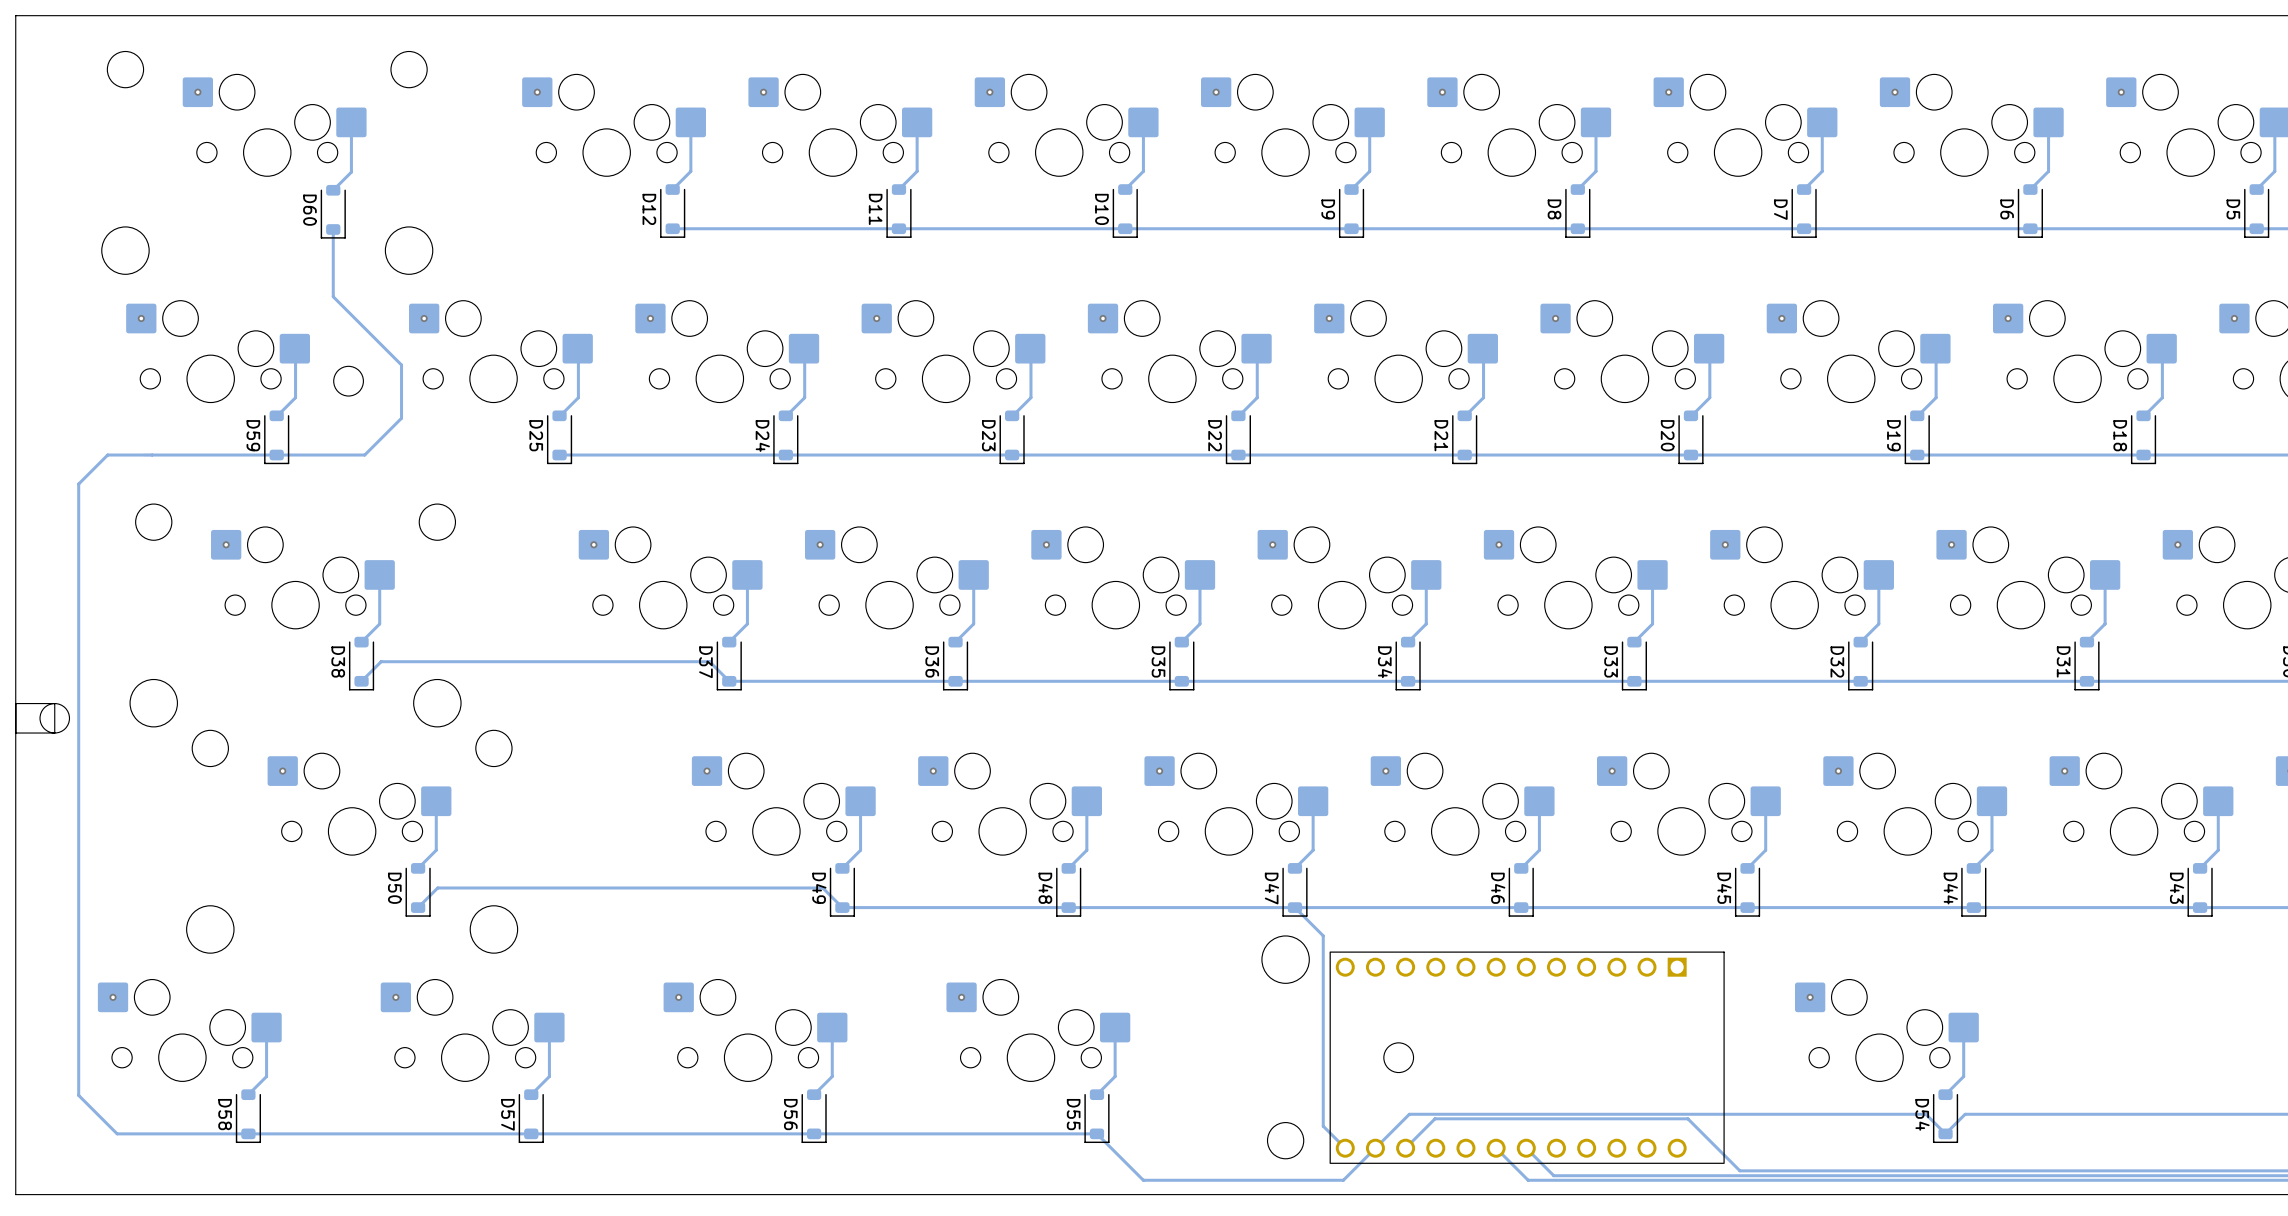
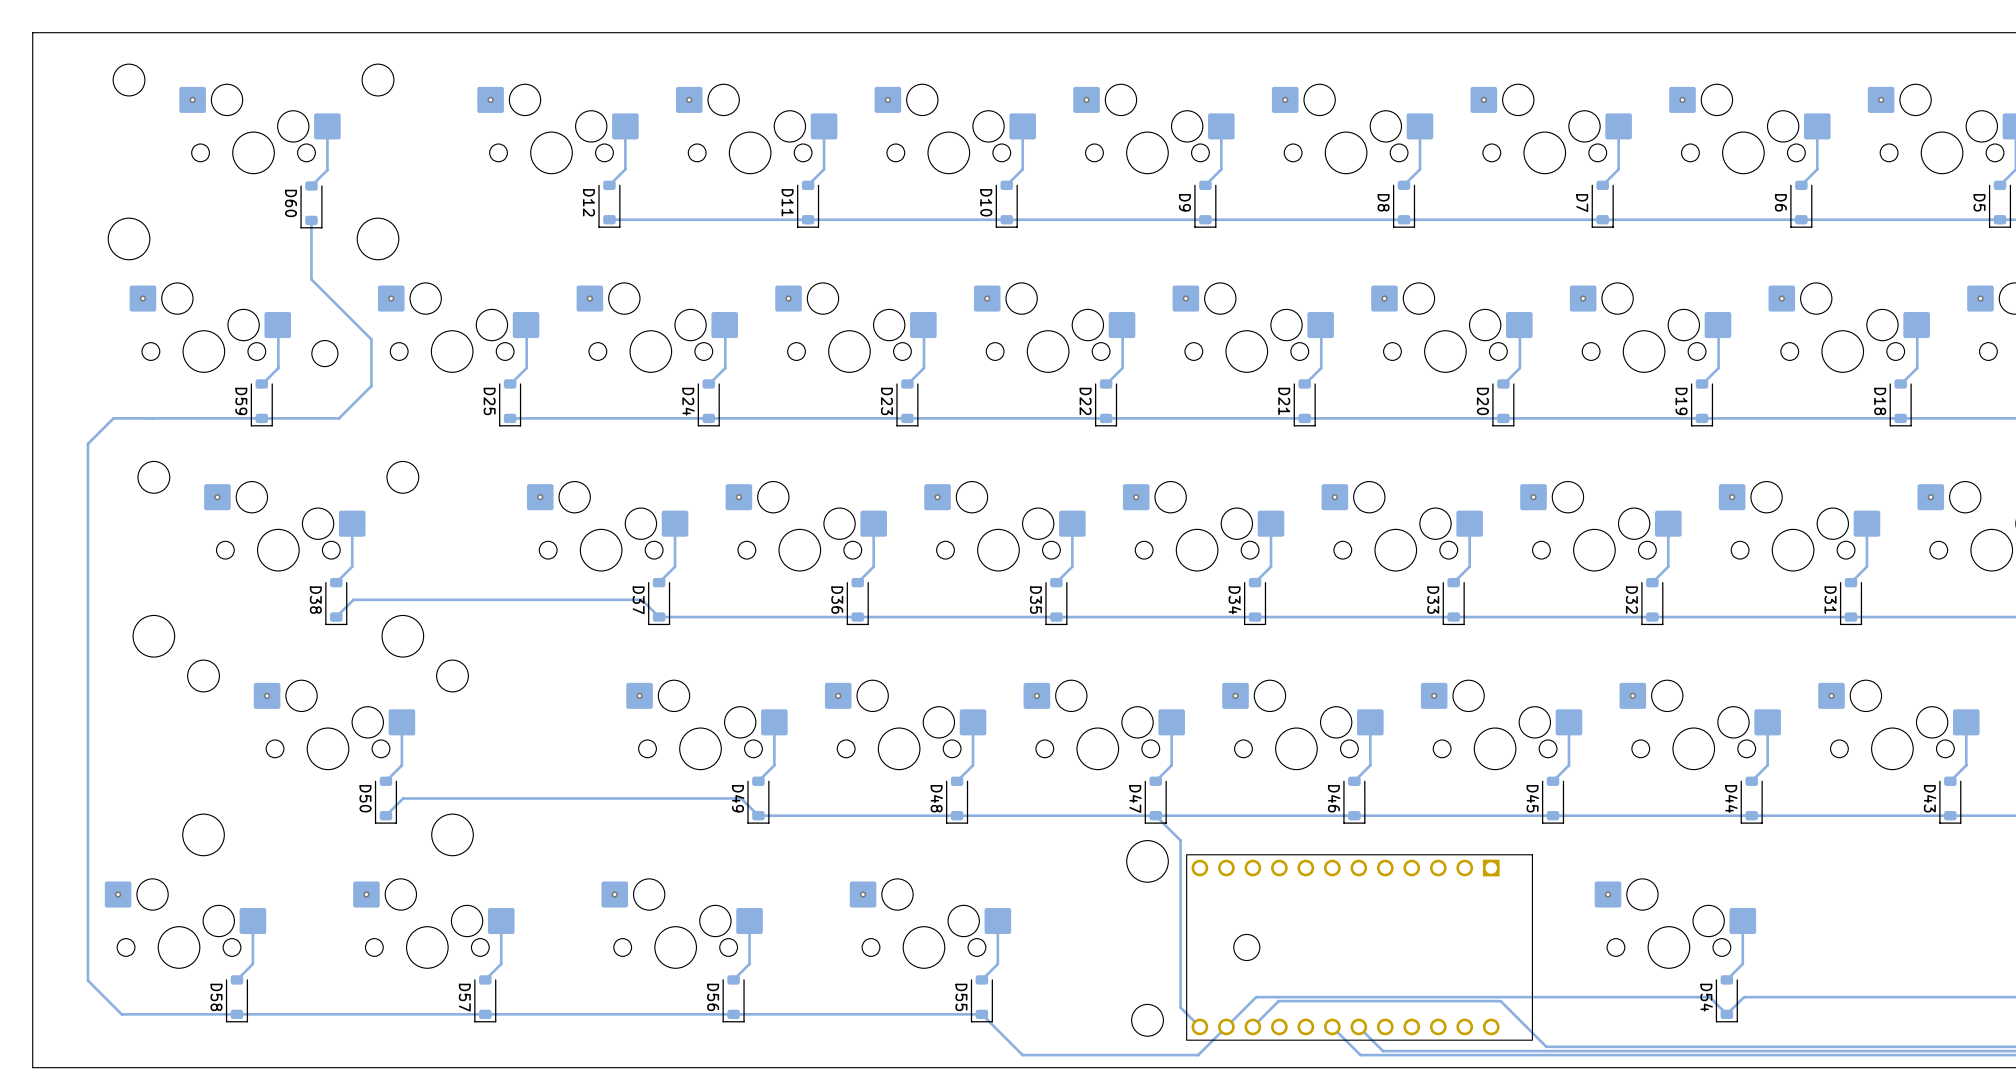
round board edge: [39, 703, 70, 734] -> none
board edge: (54, 703) (15, 703) (15, 733) (54, 733) (54, 703) -> none

